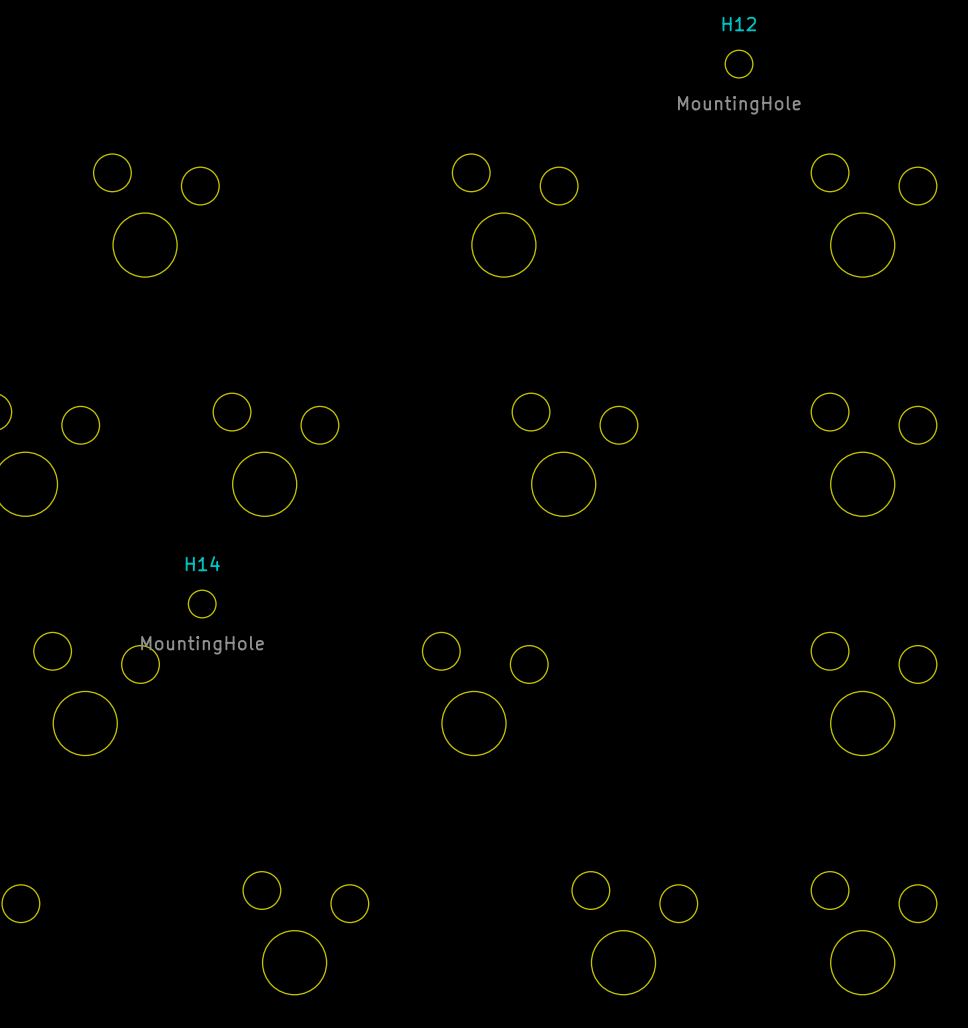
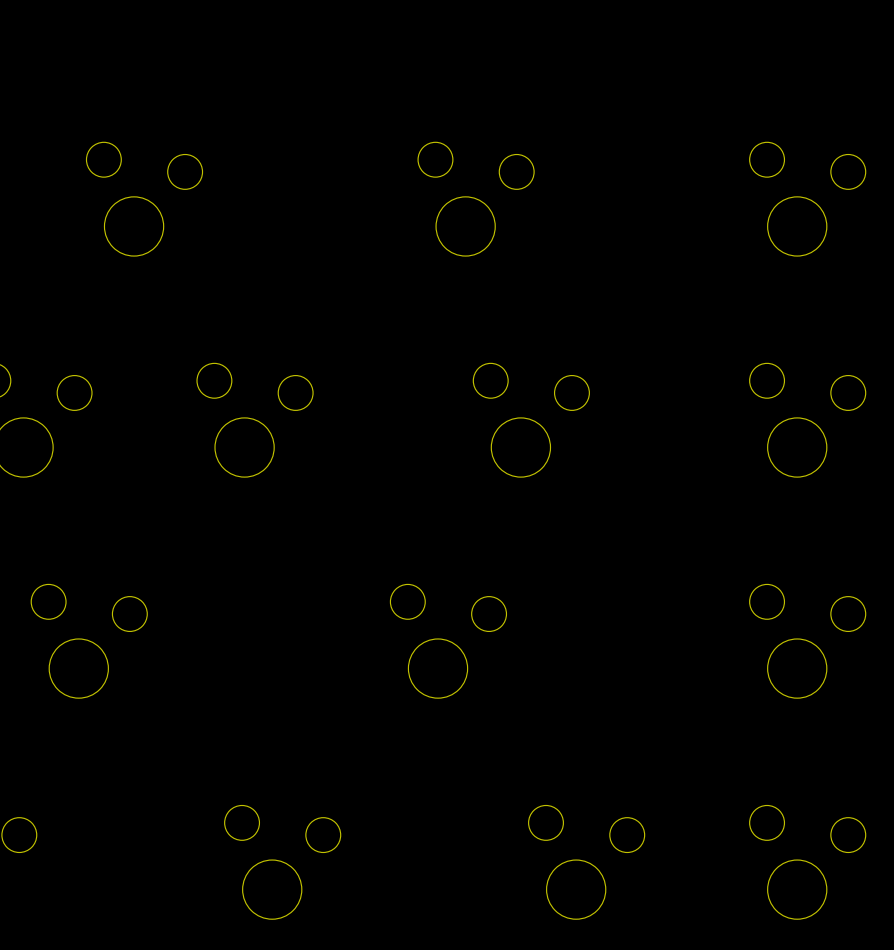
H12: MountingHole (739, 64) -> none
H14: MountingHole (202, 604) -> none

